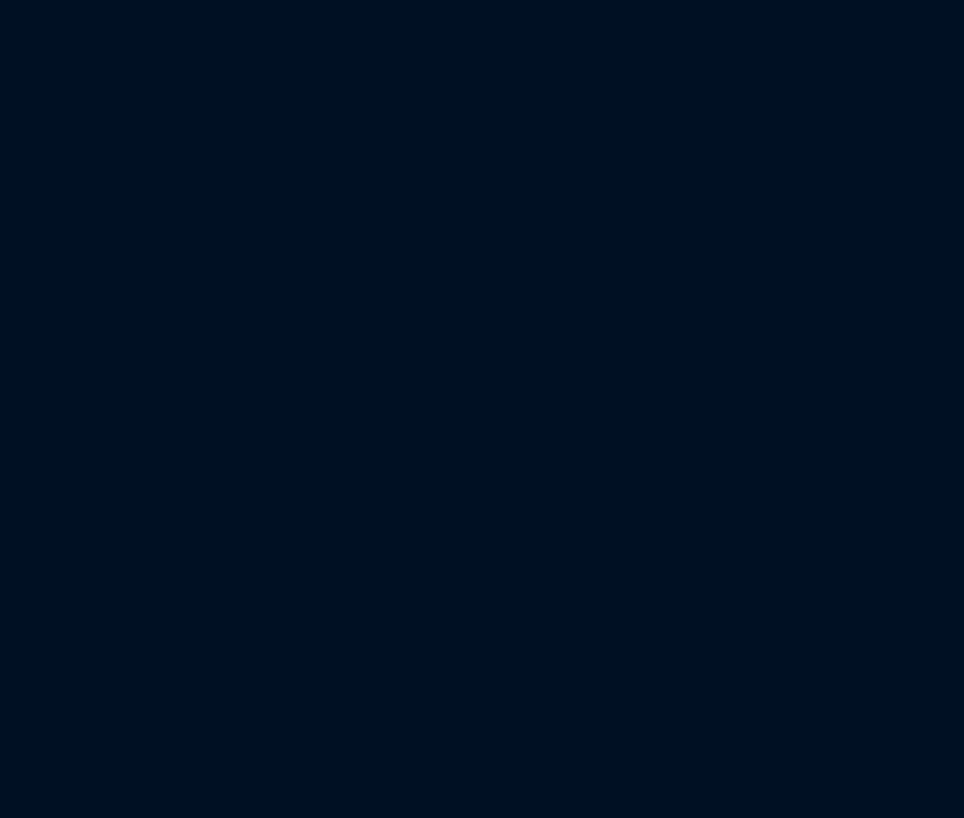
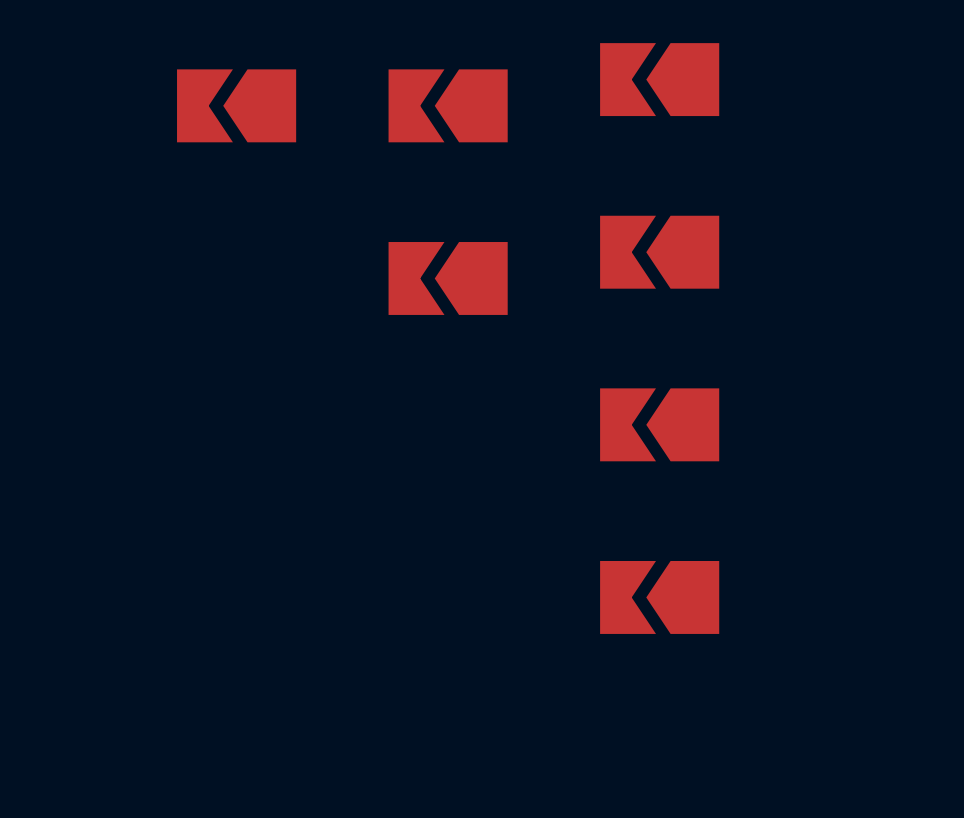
part: none -> (659, 79)
part: none -> (236, 105)
part: none -> (448, 105)
part: none -> (659, 252)
part: none -> (448, 278)
part: none -> (659, 424)
part: none -> (659, 597)

